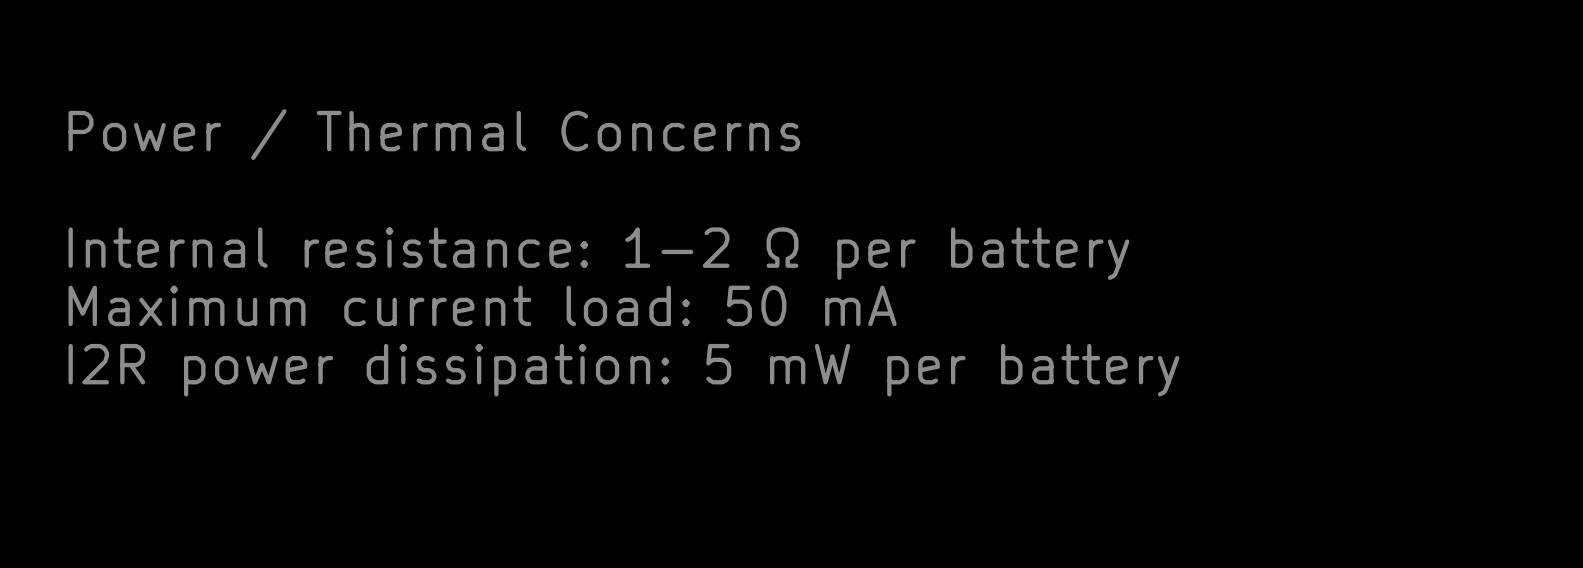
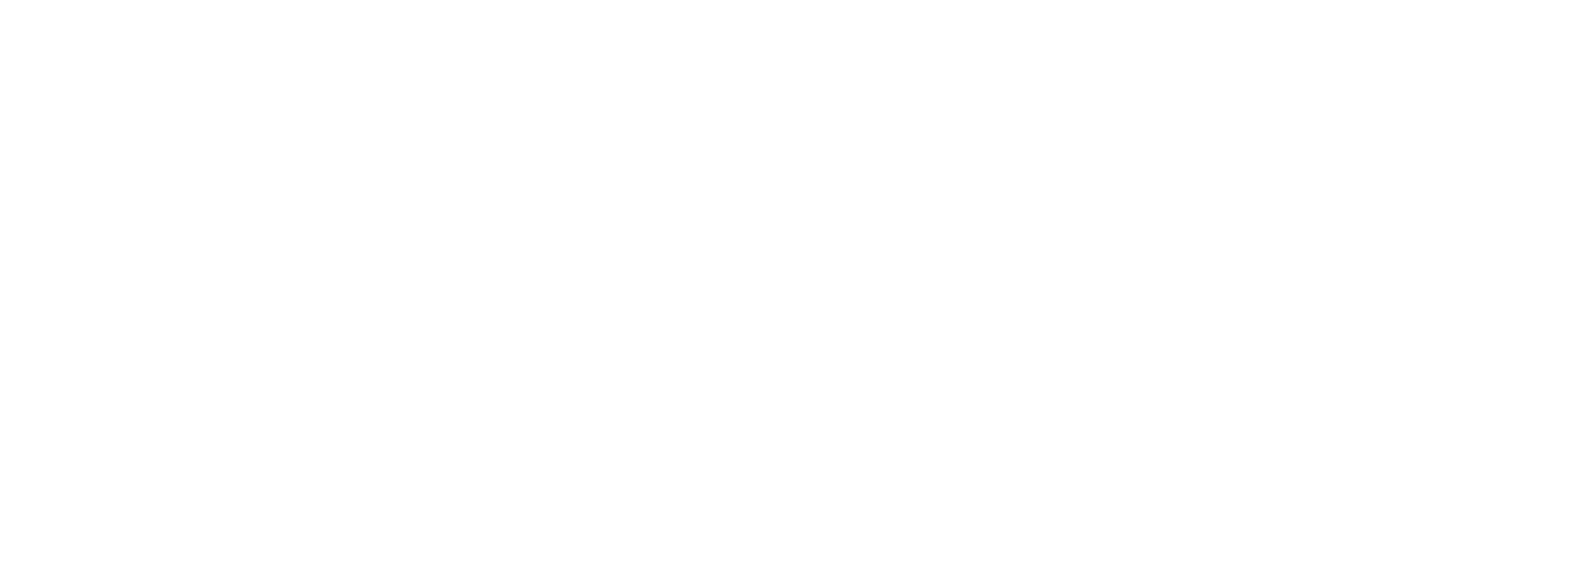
text: Power / Thermal Concerns (434, 134) -> none
text: Internal resistance: 1-2 Ω per battery (598, 253) -> none
text: Maximum current load: 50 mA (482, 305) -> none
text: I2R power dissipation: 5 mW per battery (623, 370) -> none

